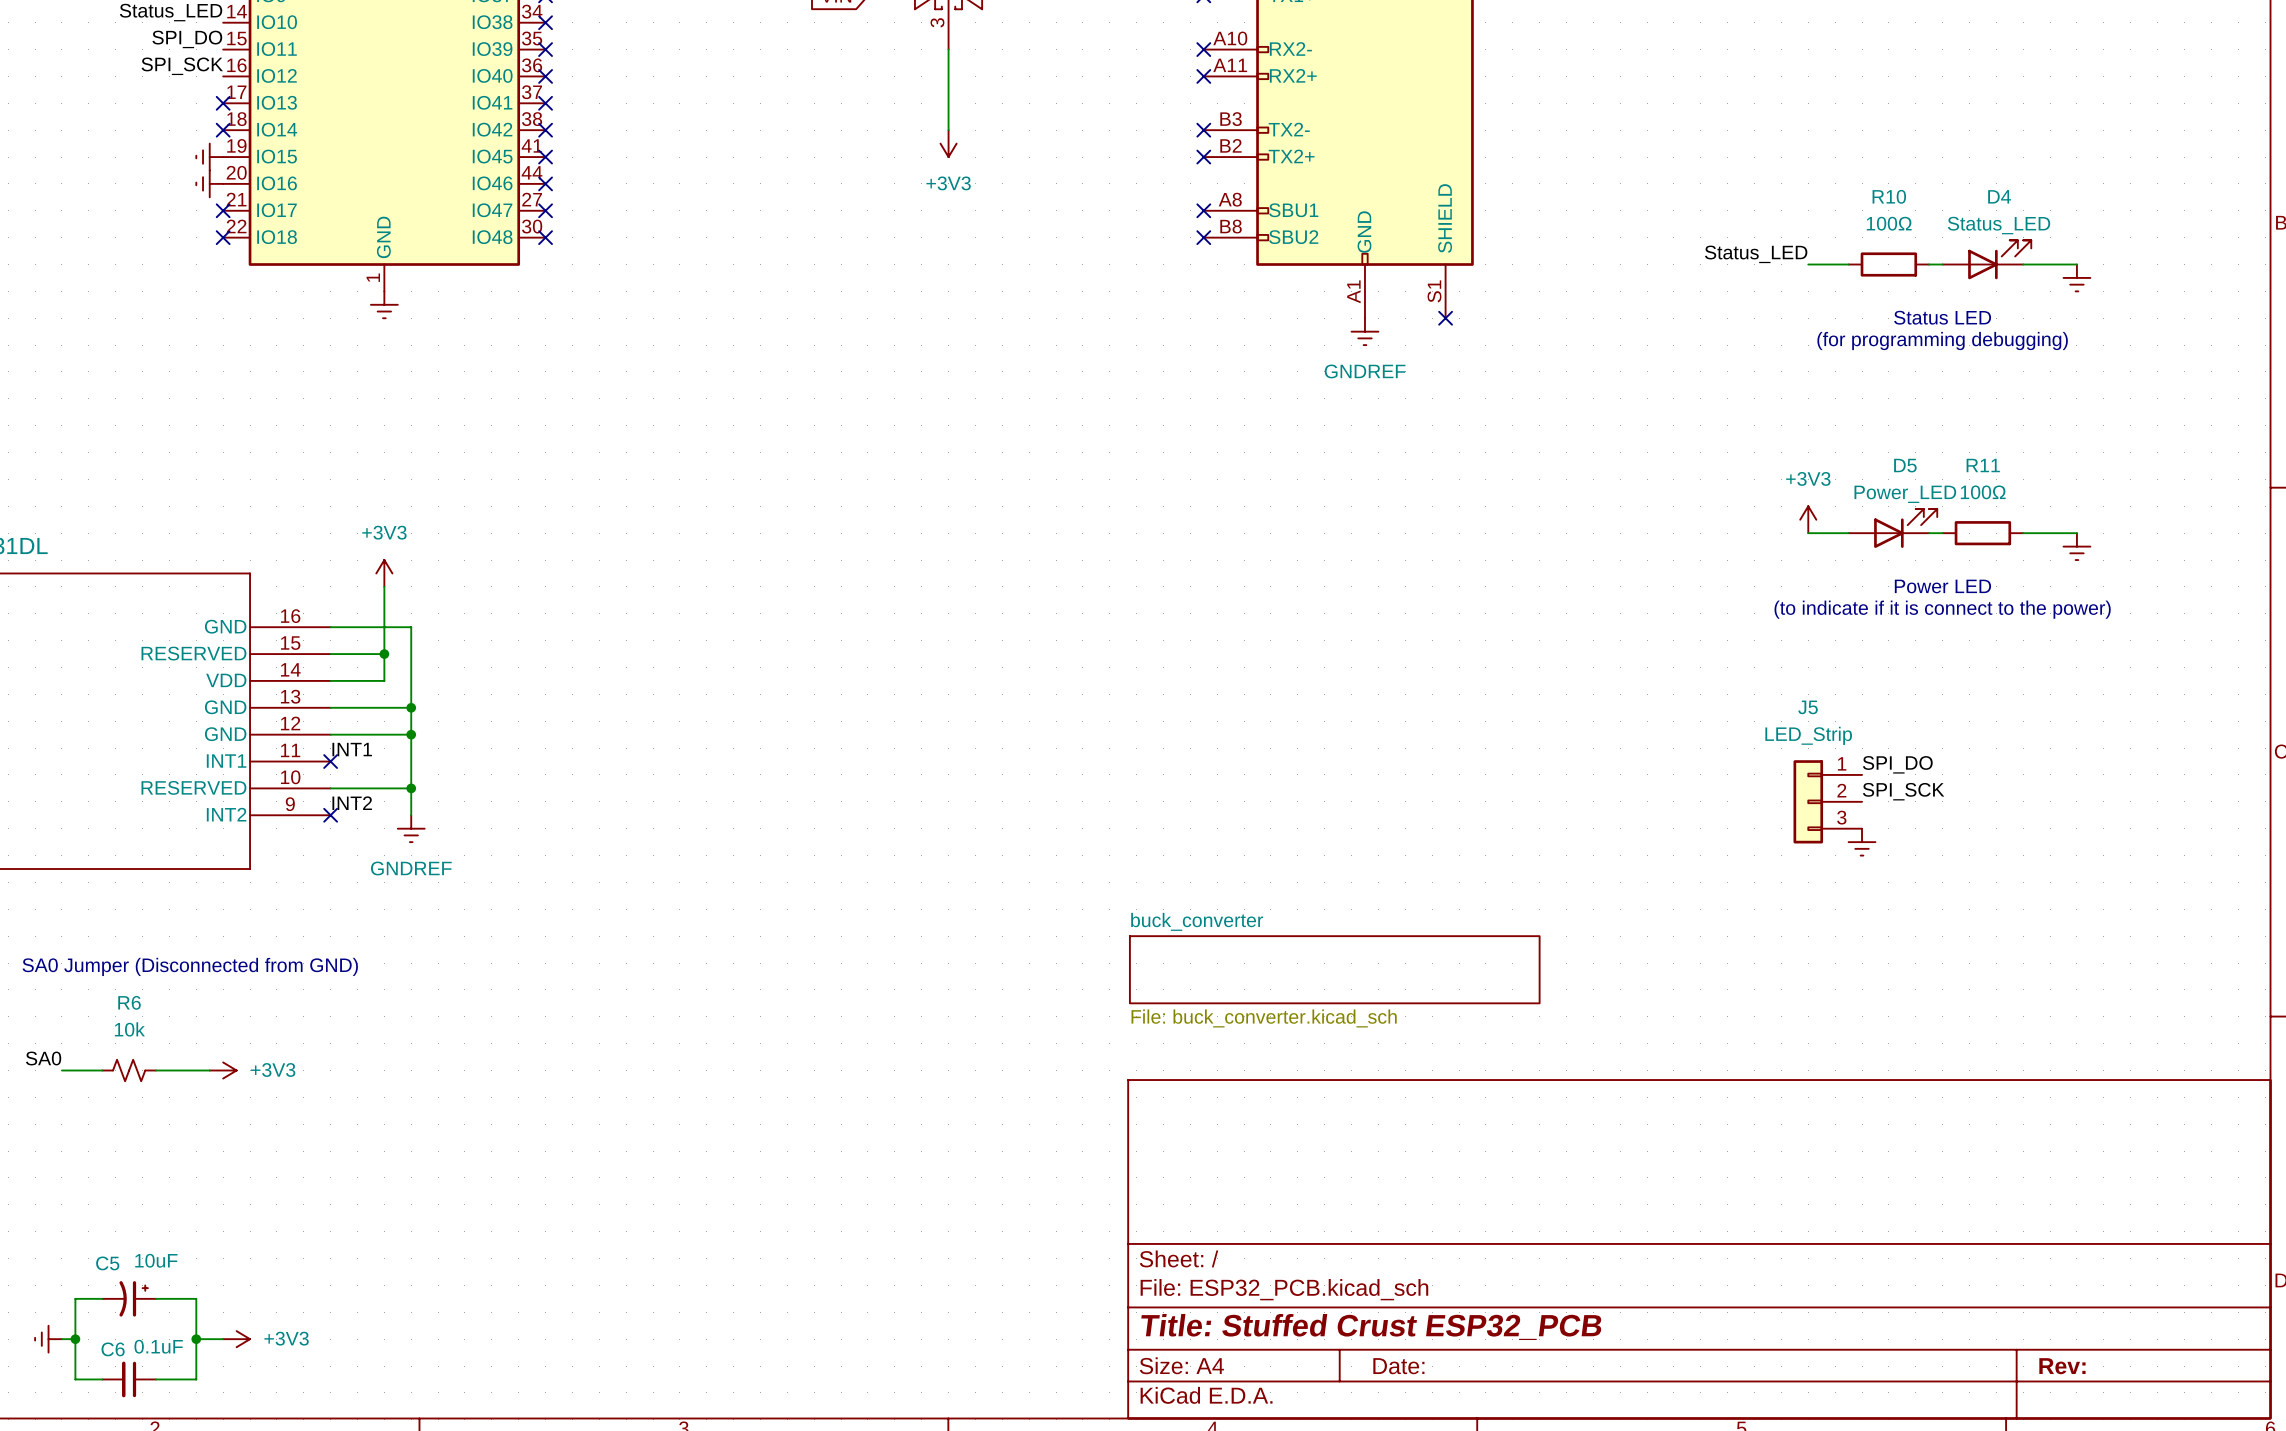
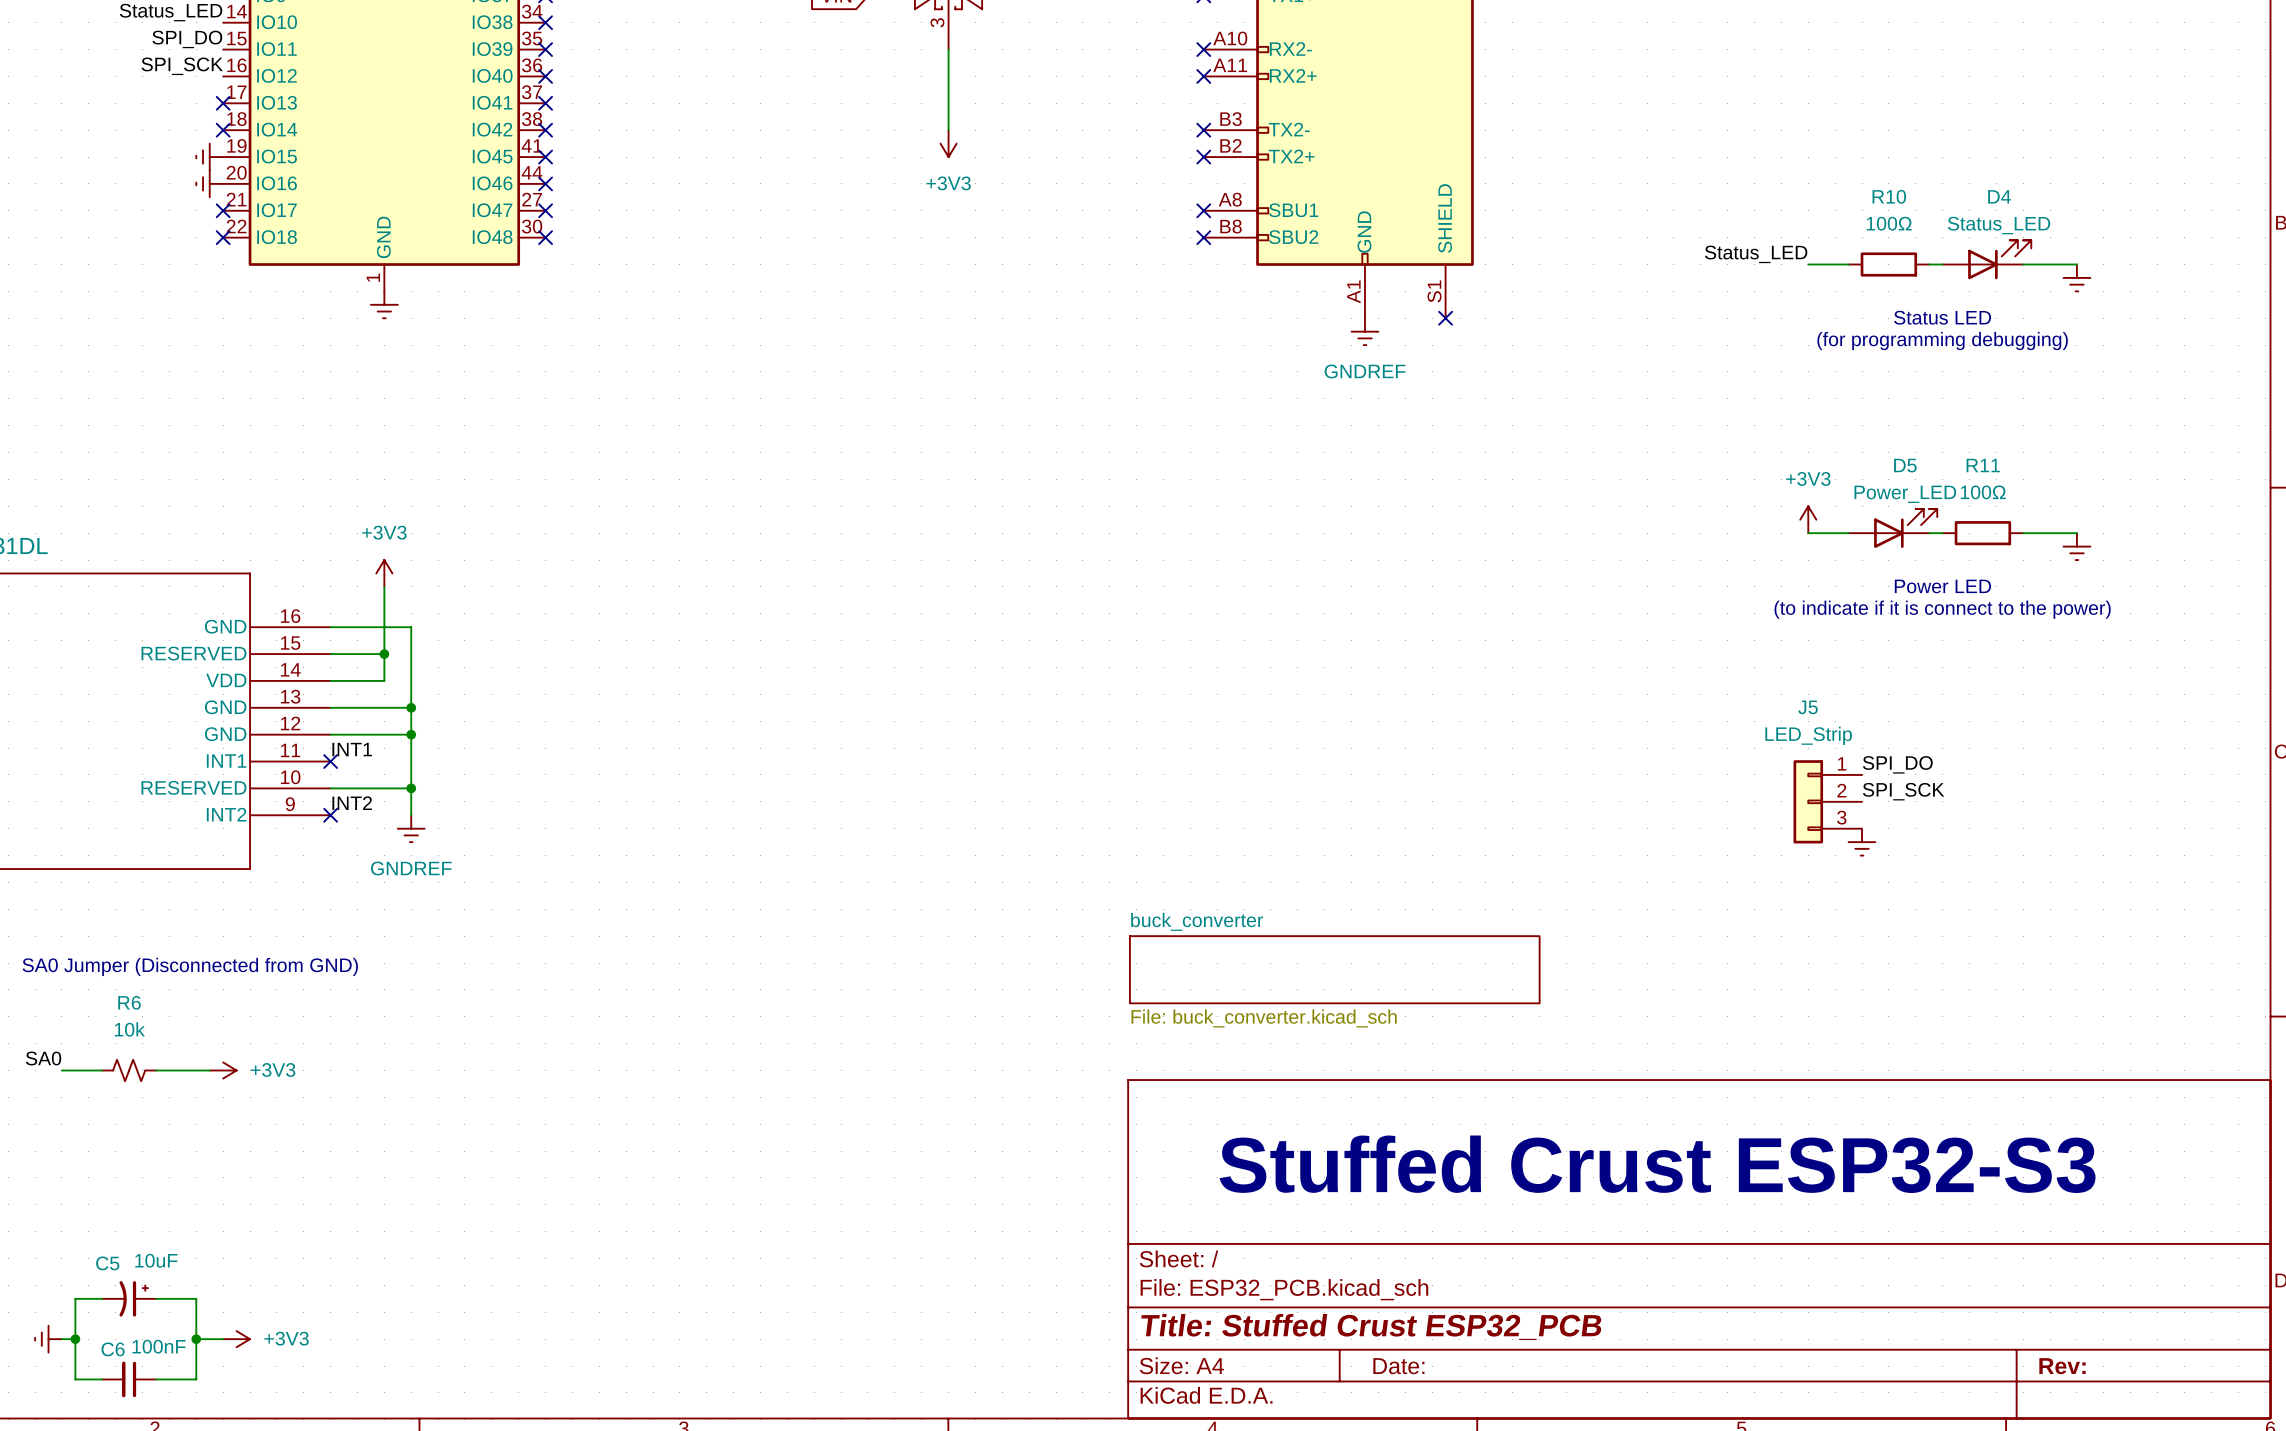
text: none -> Stuffed Crust ESP32-S3 (1657, 1164)
C6 value: 0.1uF (158, 1346) -> 100nF (159, 1346)

